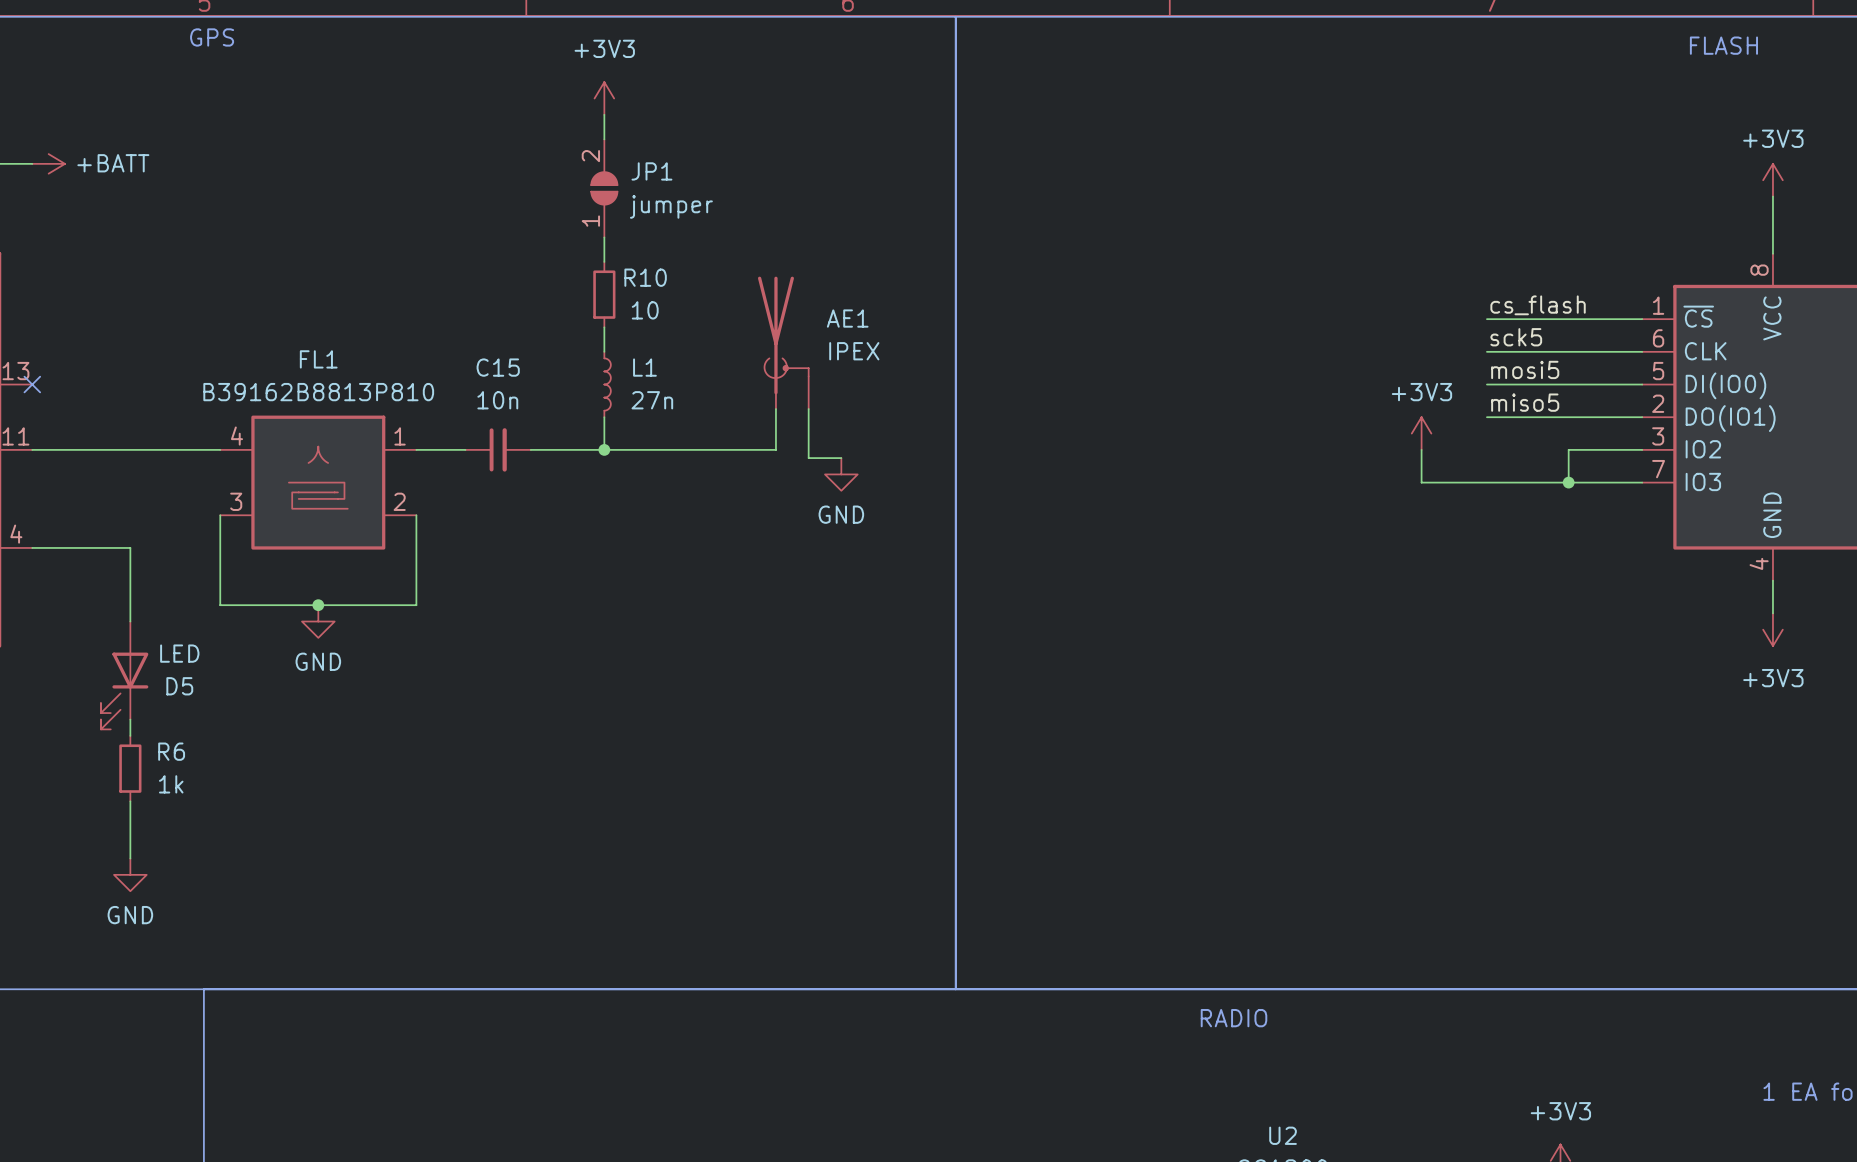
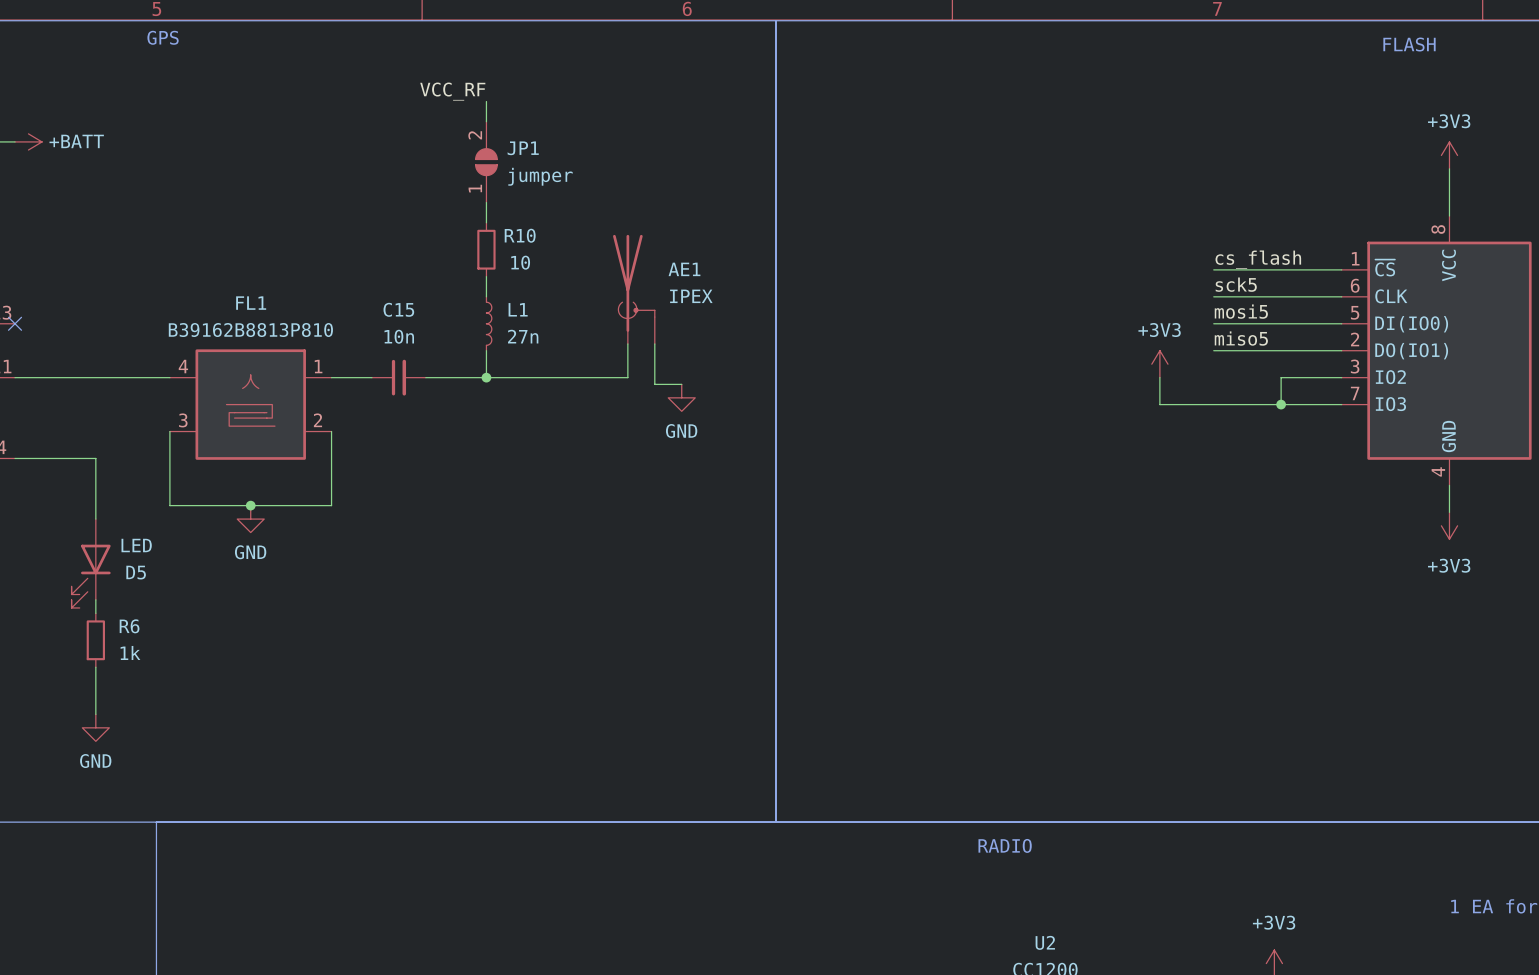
power symbol: +3V3 (604, 98) -> none
label: none -> VCC_RF (452, 91)

